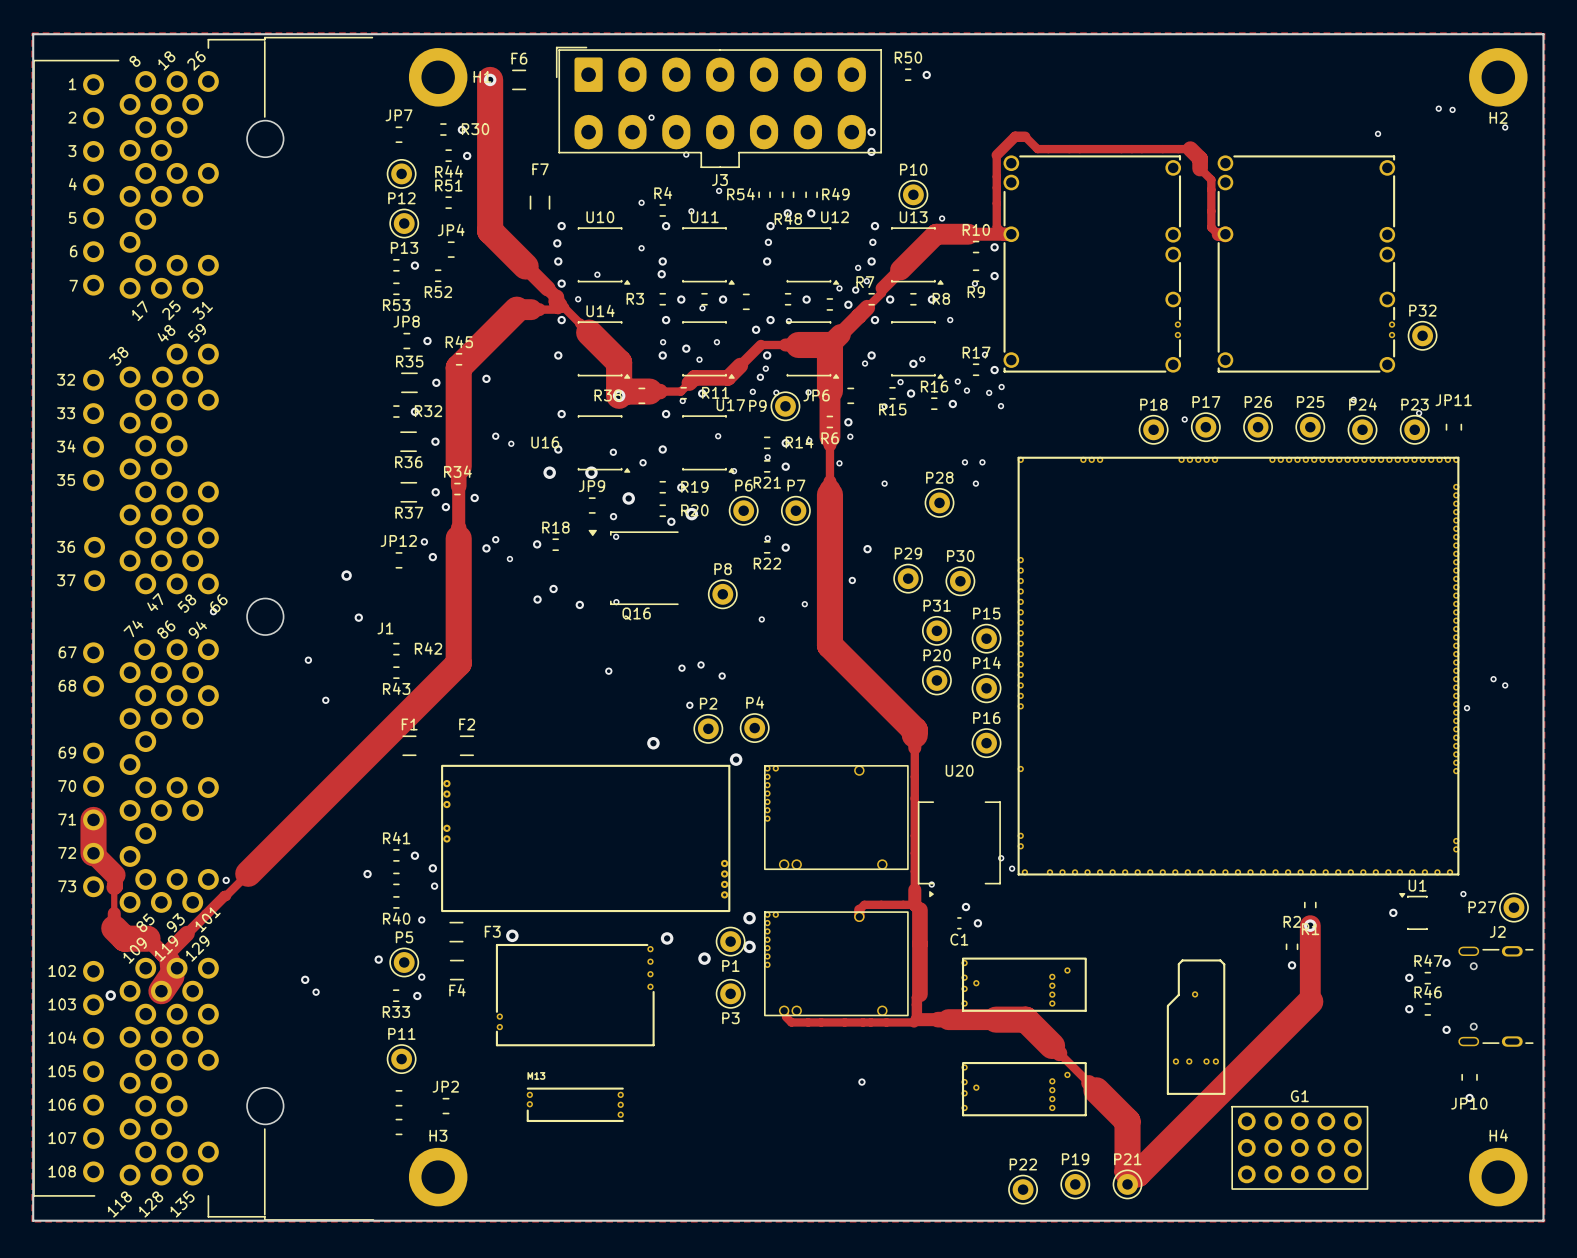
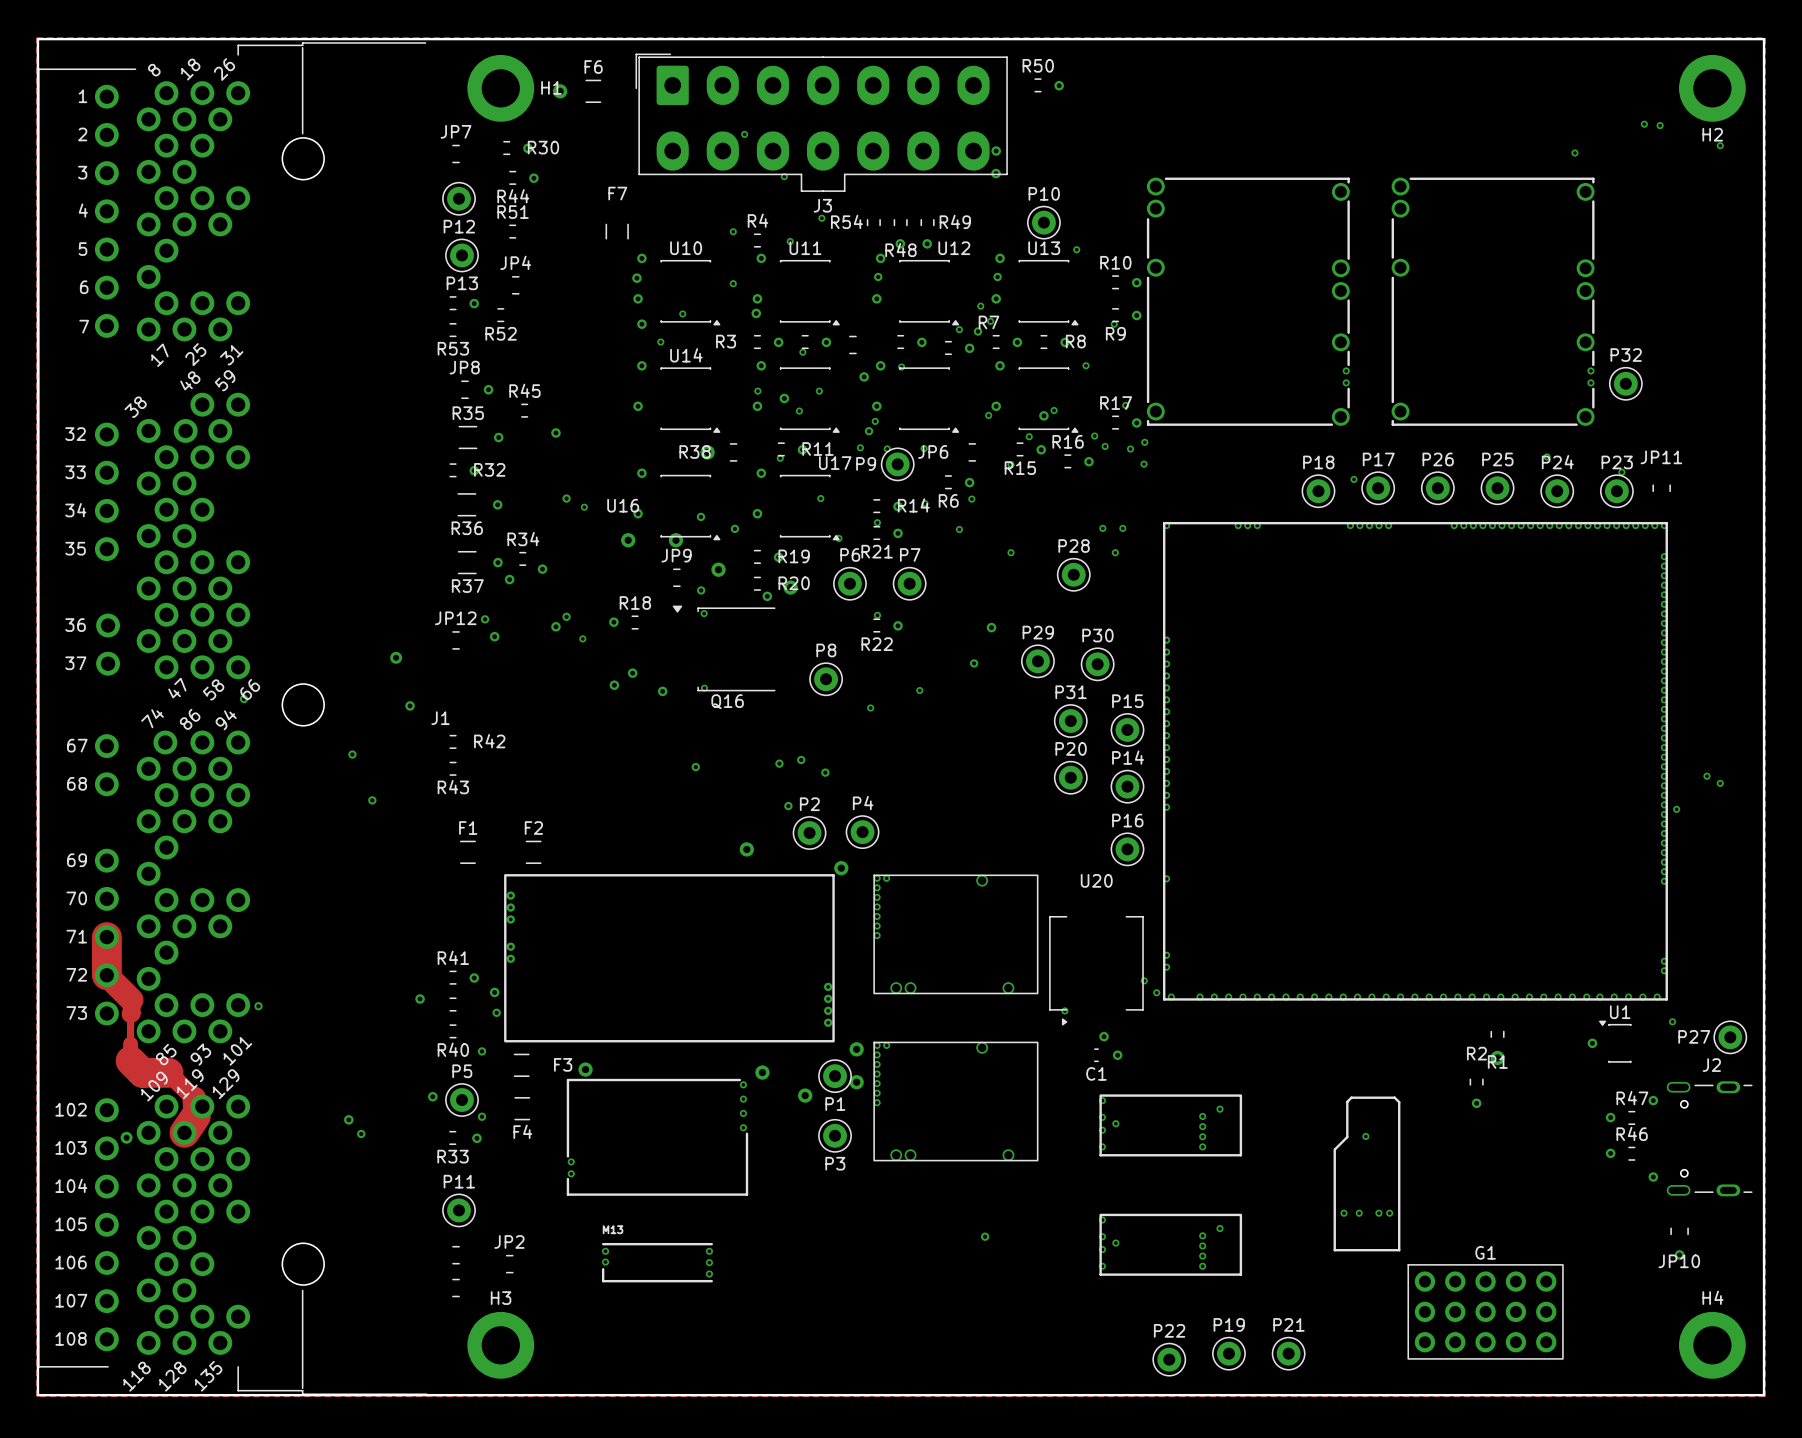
track: (490, 79) (490, 230) (556, 297) (559, 307) -> none
track: (1004, 234) (996, 226) (996, 155) (1015, 136) (1025, 136) (1037, 149) (1190, 149) (1200, 158) (1200, 168) (1211, 179) (1211, 227) (1218, 234) (1225, 234) -> none
track: (1005, 234) (936, 234) (882, 288) (882, 292) (829, 344) -> none
track: (559, 307) (557, 309) (516, 309) (458, 367) (458, 663) (226, 895) (166, 954) (162, 954) -> none
track: (559, 307) (564, 307) (619, 362) (619, 395) -> none
track: (829, 344) (829, 645) (914, 730) (914, 904) -> none
track: (829, 344) (760, 344) (728, 377) (694, 377) (680, 391) (619, 391) -> none
track: (914, 904) (864, 904) (859, 909) (859, 916) -> none
track: (914, 904) (919, 909) (919, 994) (916, 997) (916, 1019) -> none
track: (1310, 925) (1310, 1001) (1137, 1174) (1131, 1175) (1127, 1171) (1127, 1121) (1025, 1019) (916, 1019) -> none
track: (784, 1010) (785, 1017) (791, 1022) (914, 1022) (916, 1019) -> none

